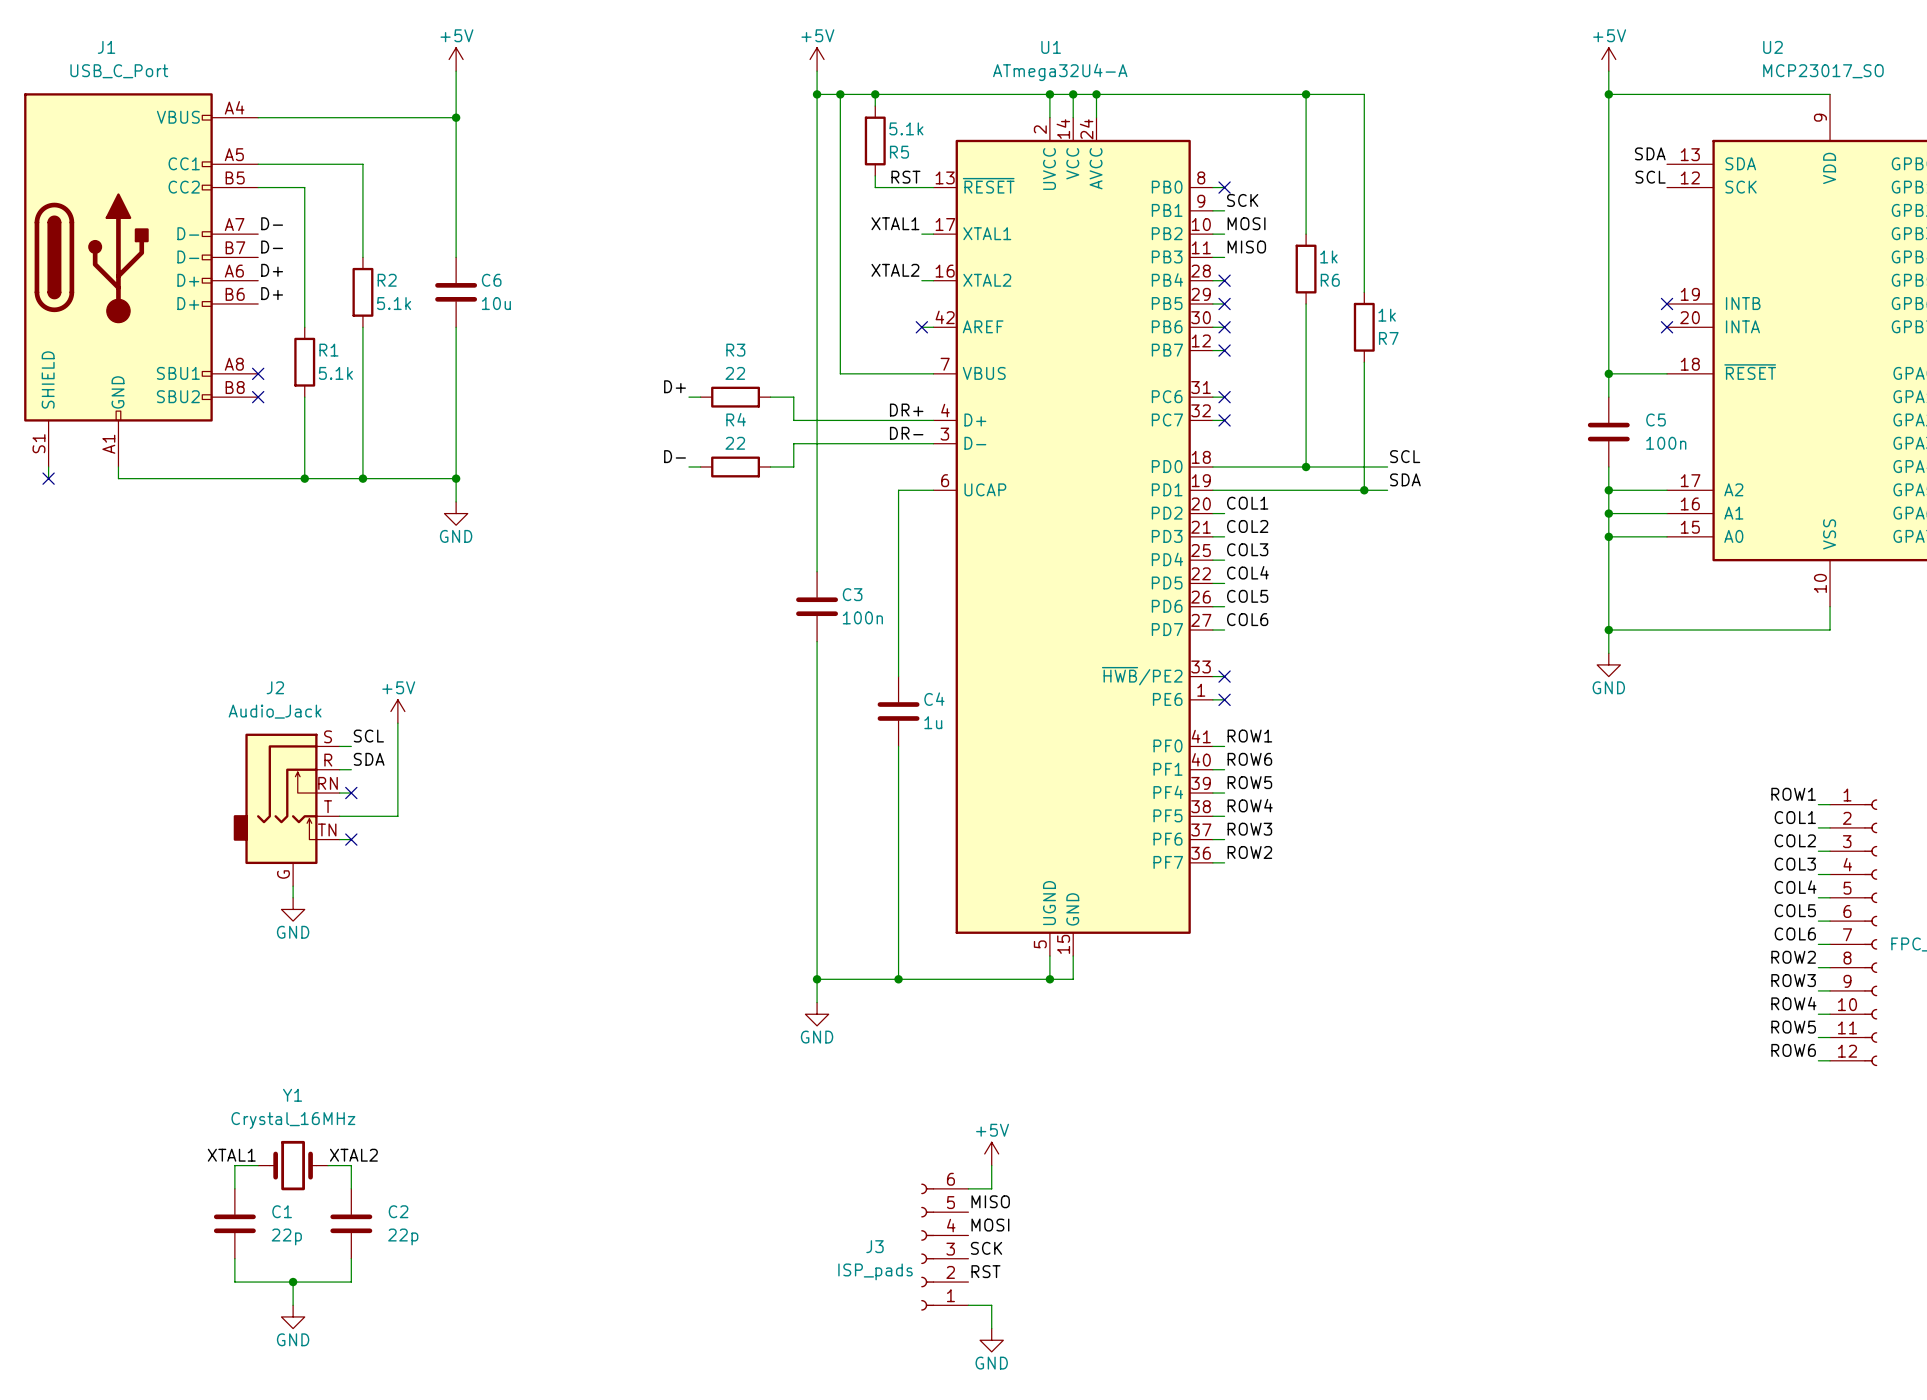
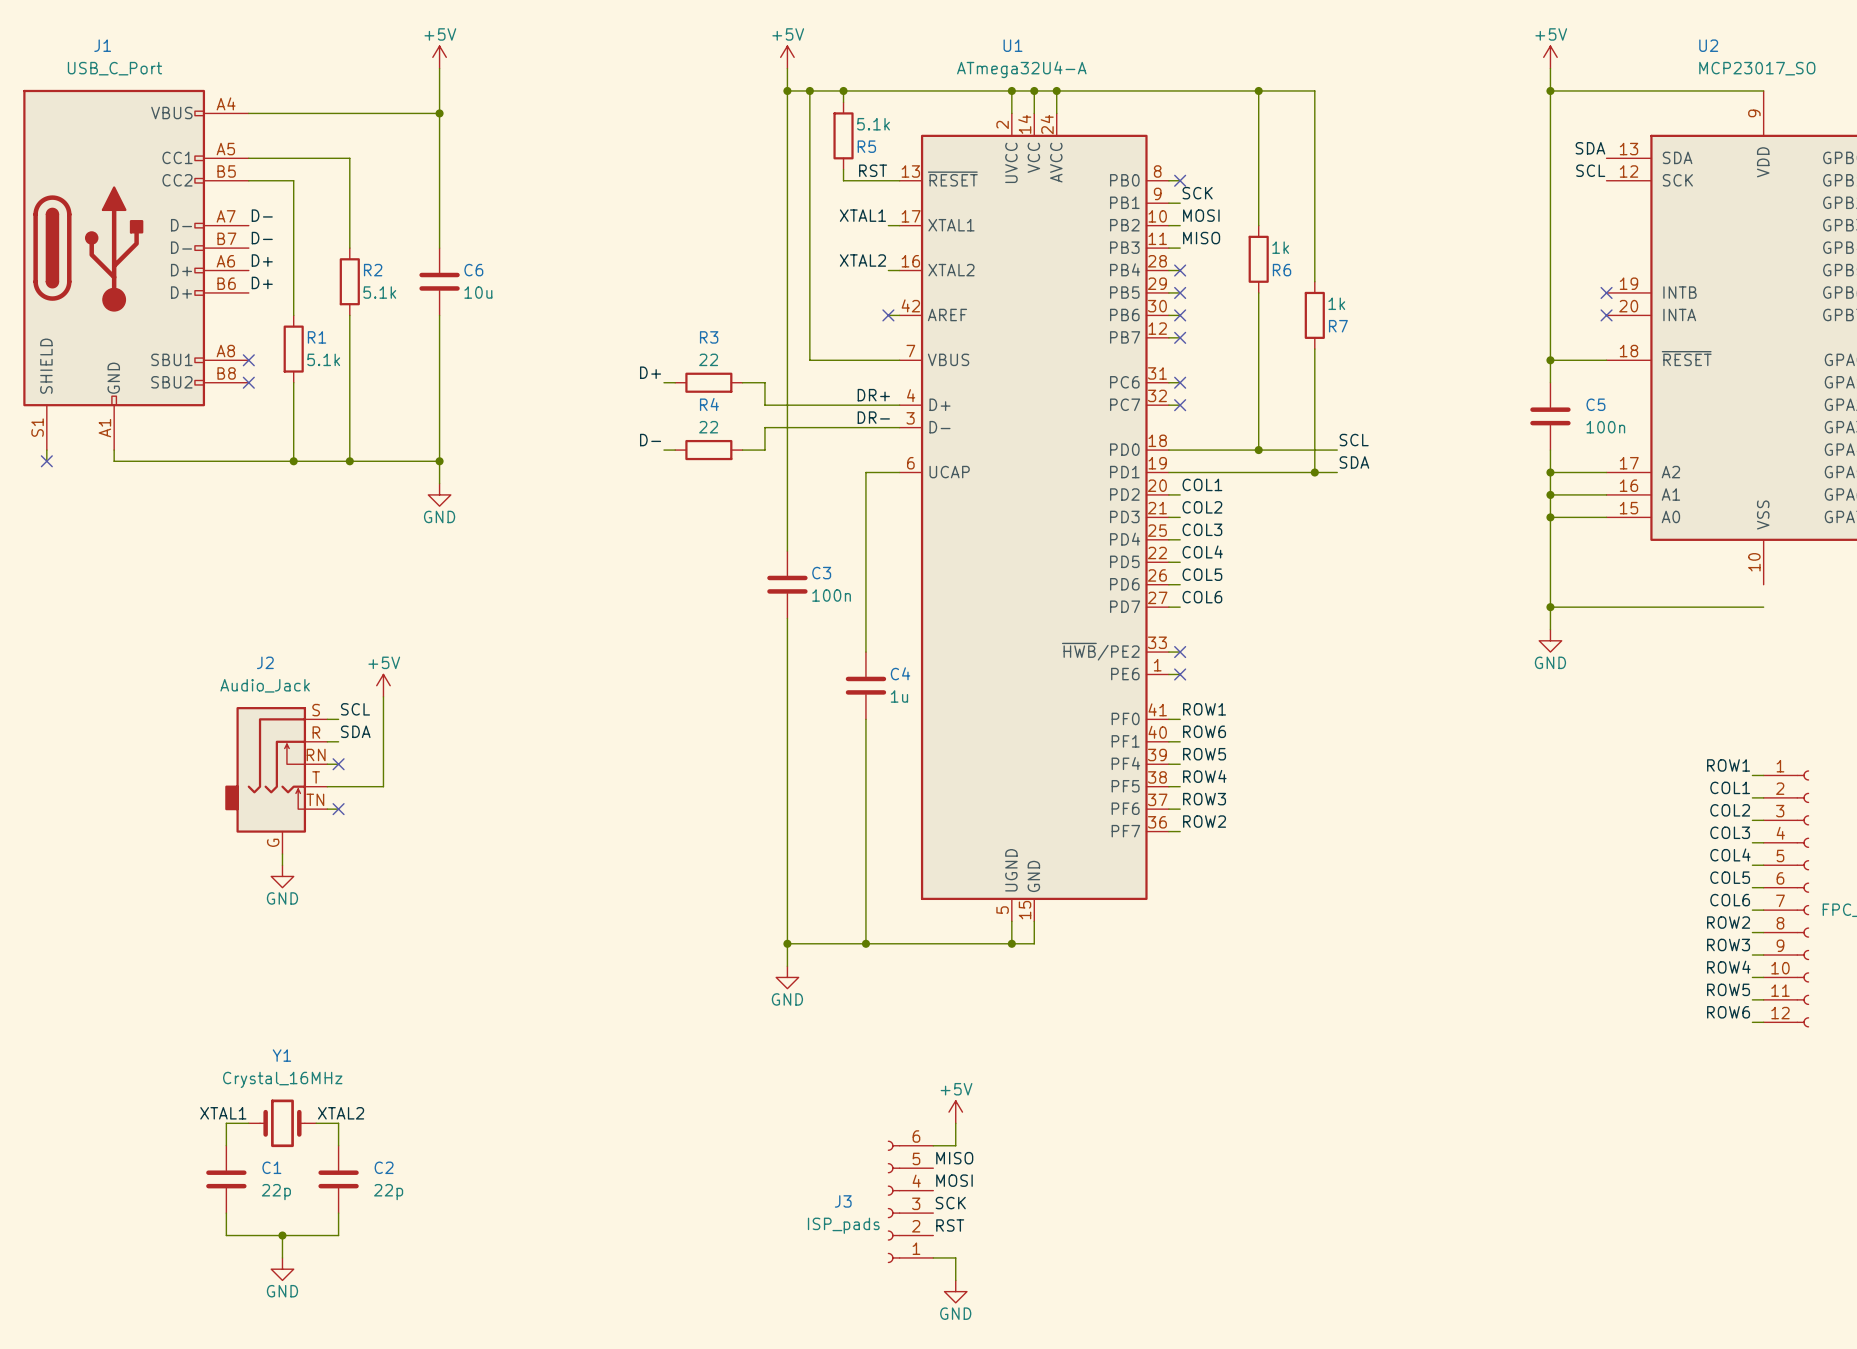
wire: (1830, 606) (1830, 630) -> none

